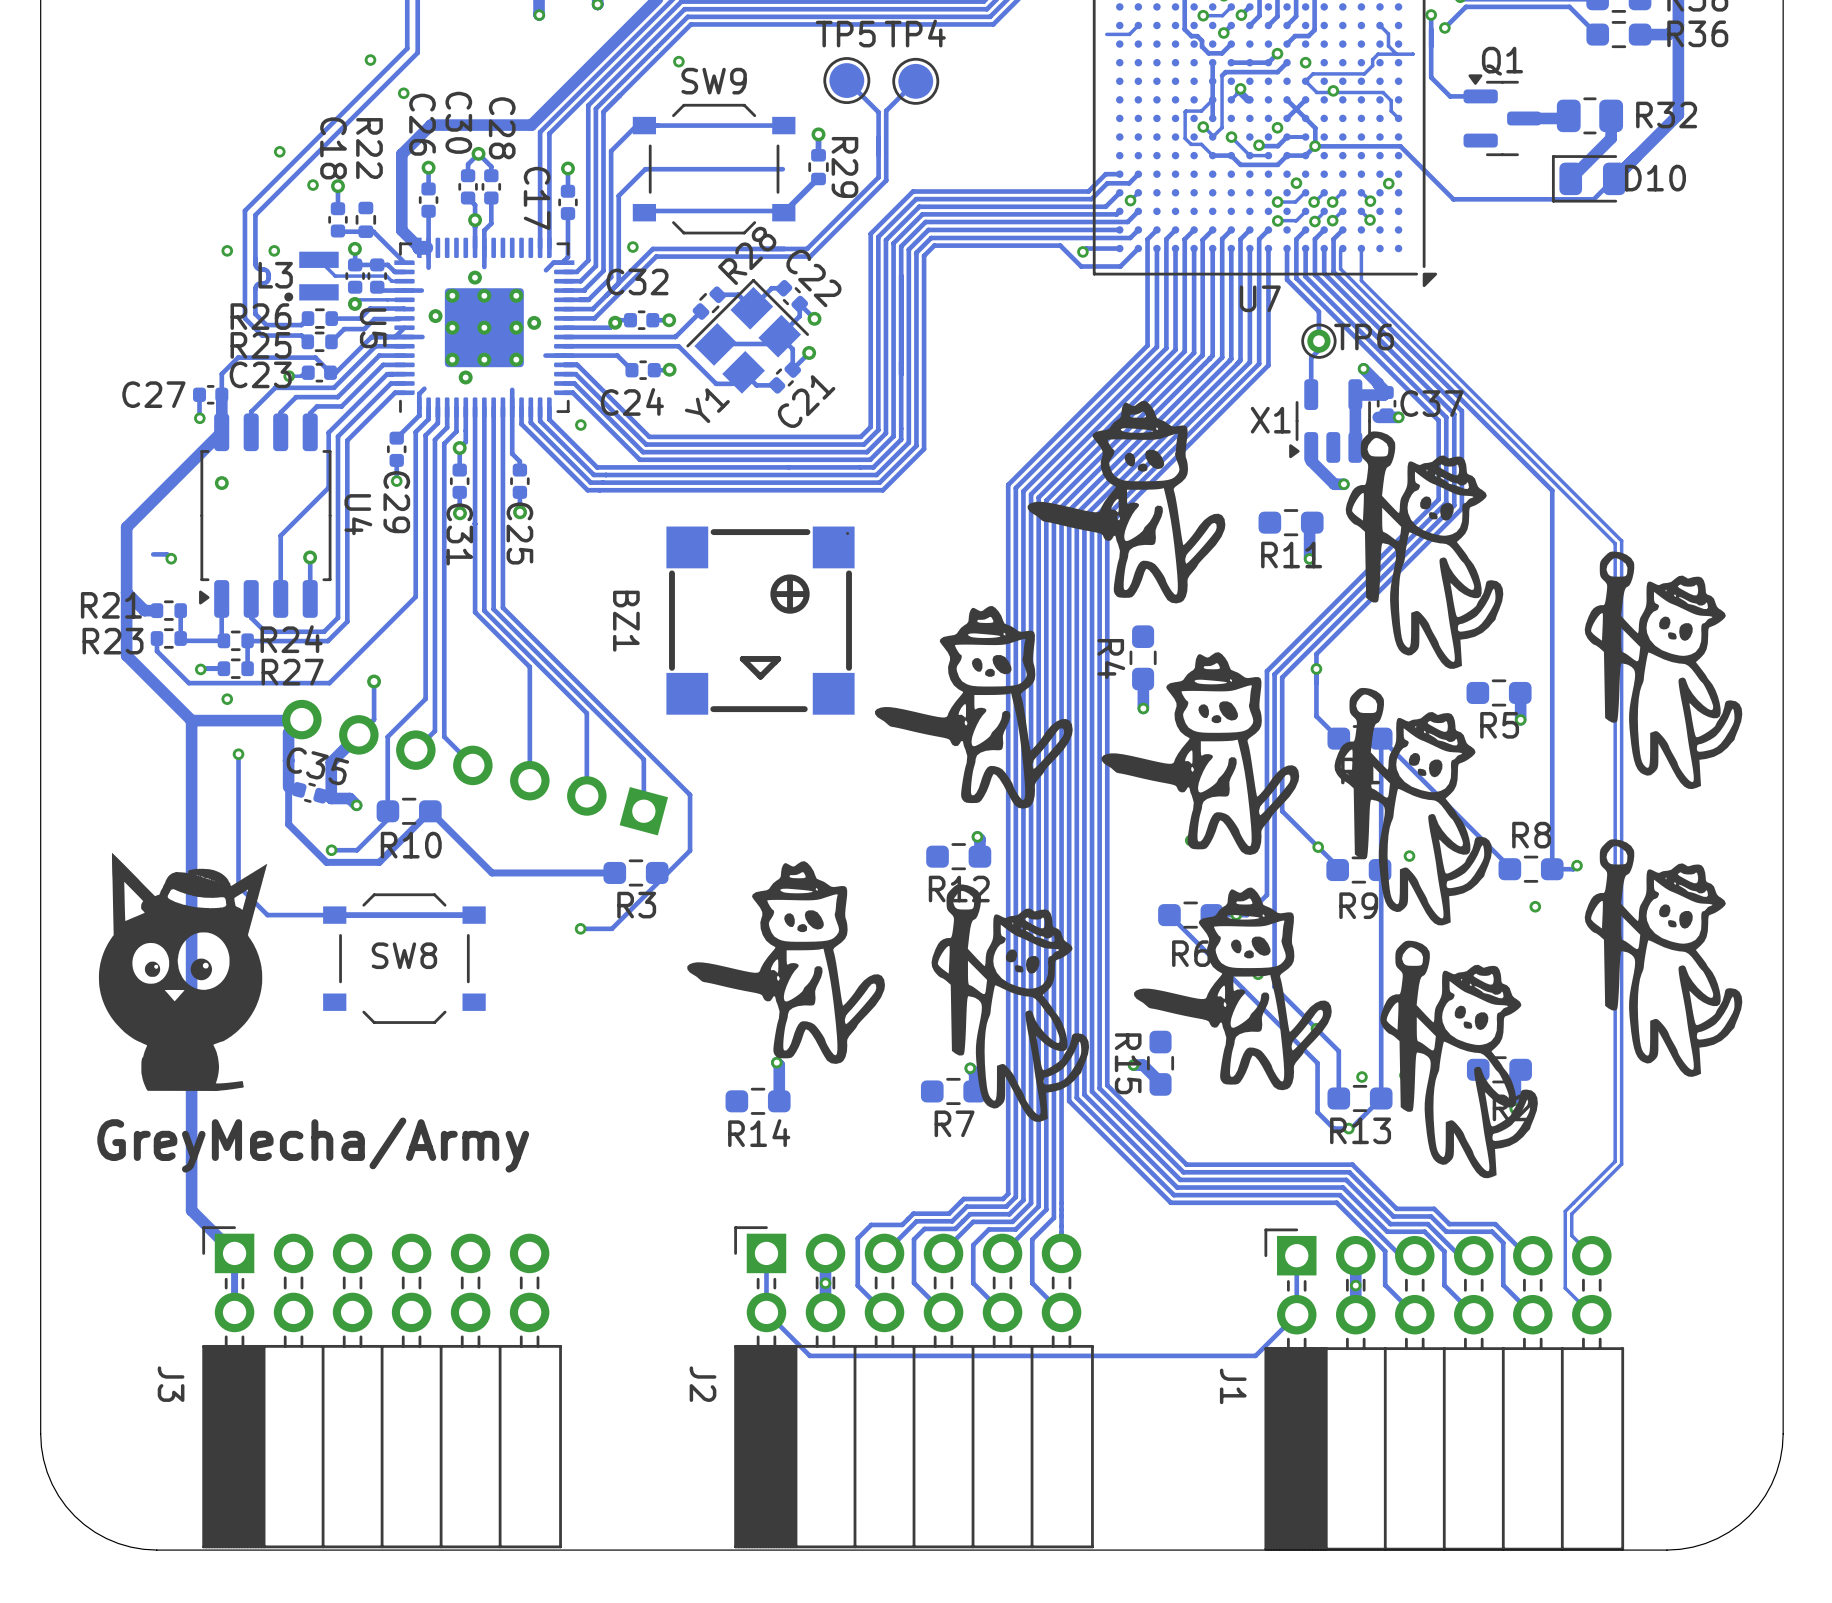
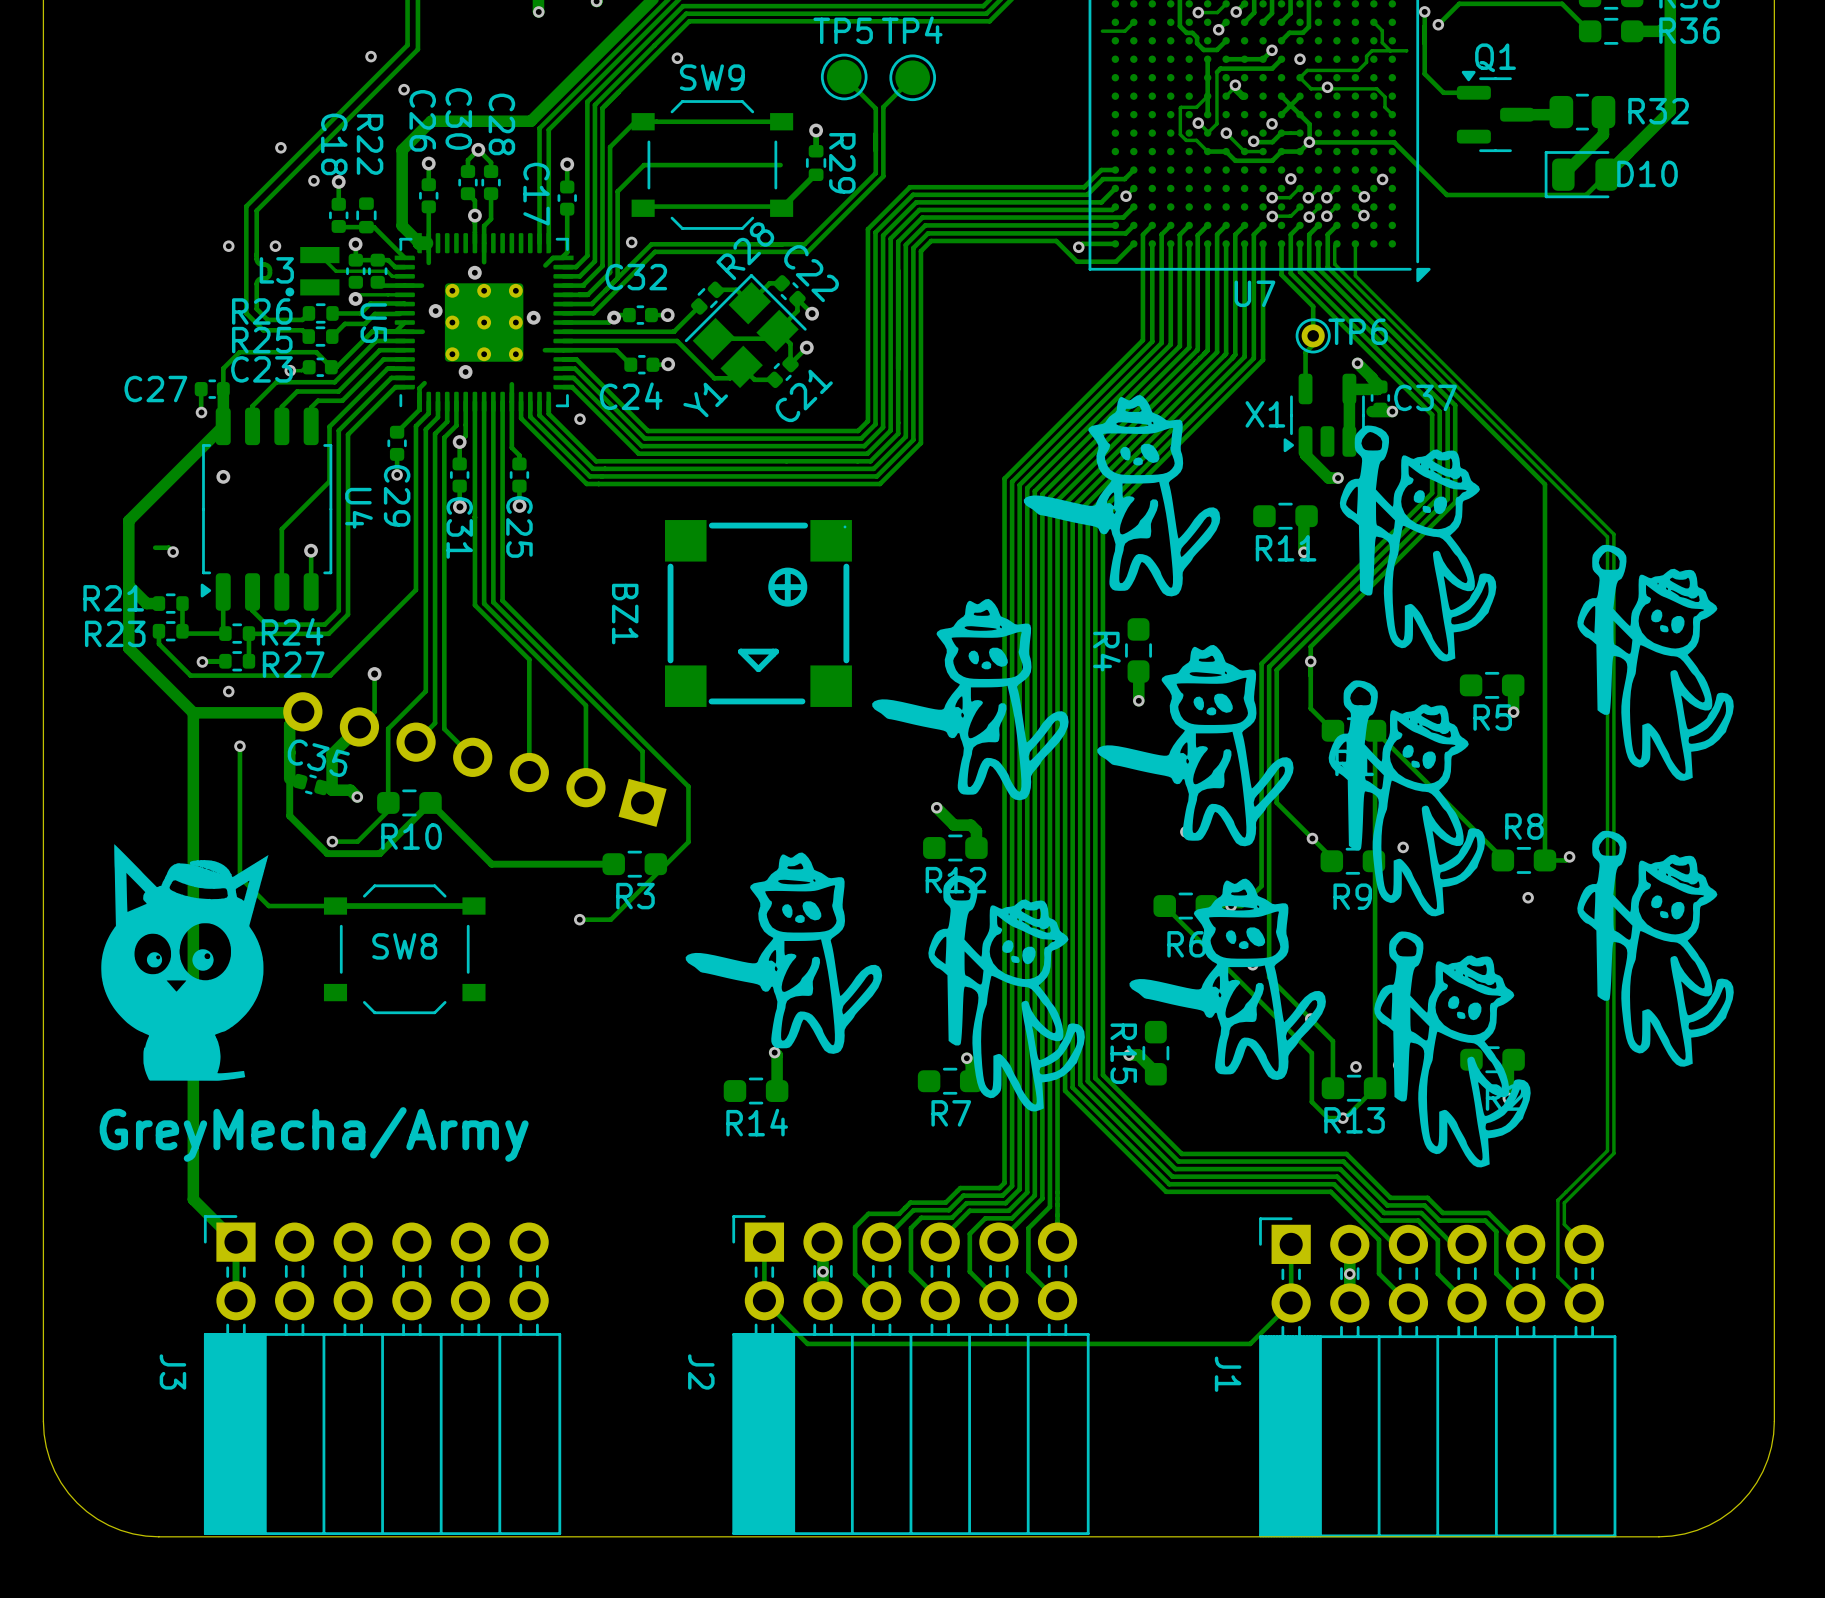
track: none -> (936, 807) (954, 825) (970, 825) (973, 828)
via position: (977, 836) -> (936, 807)

